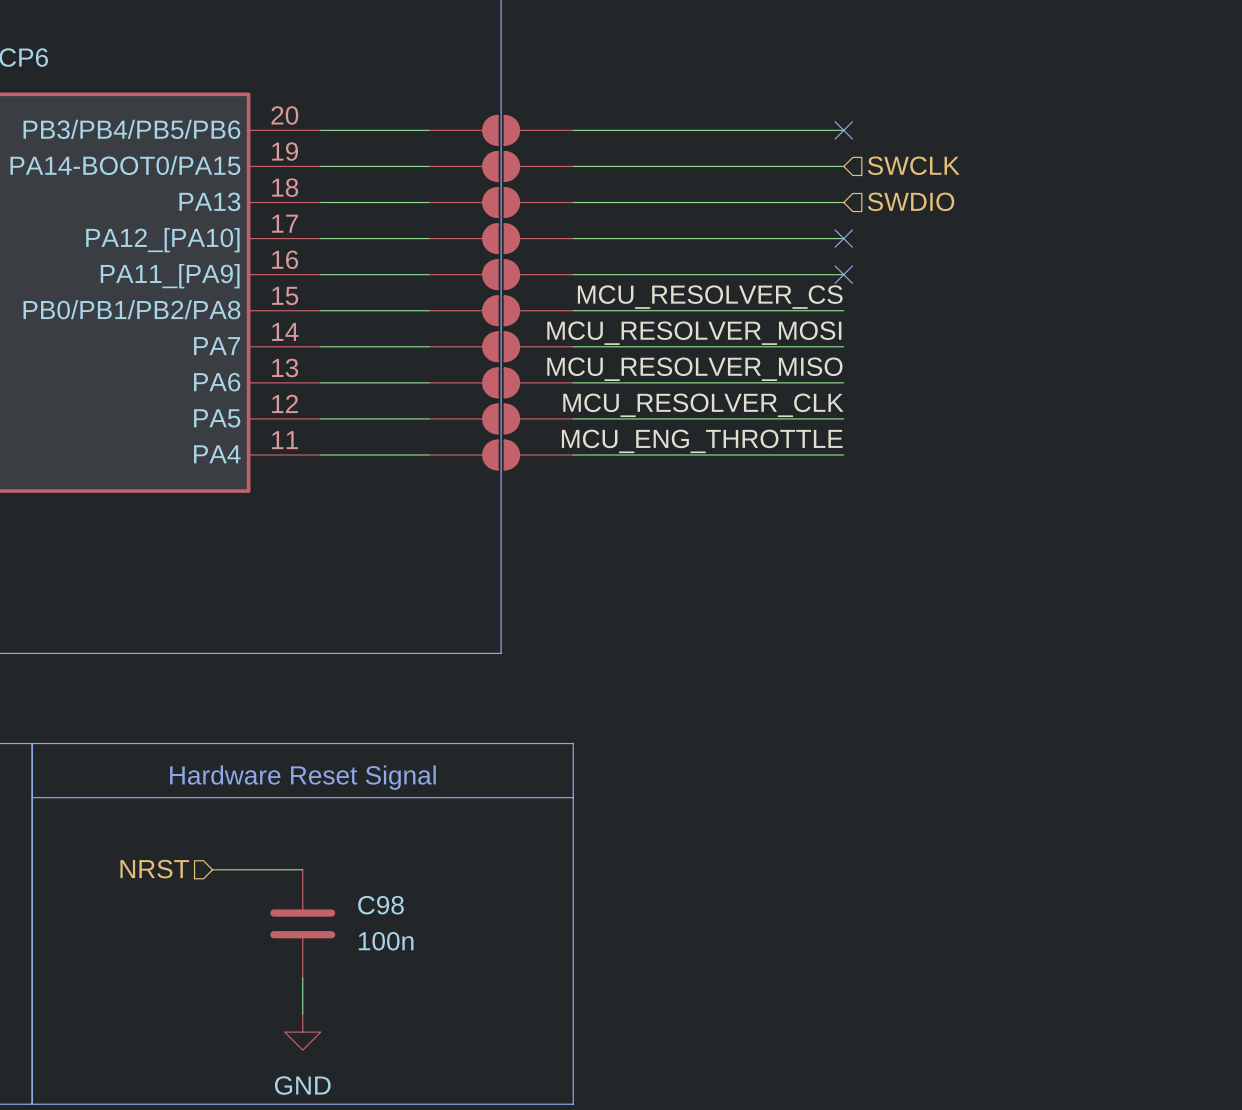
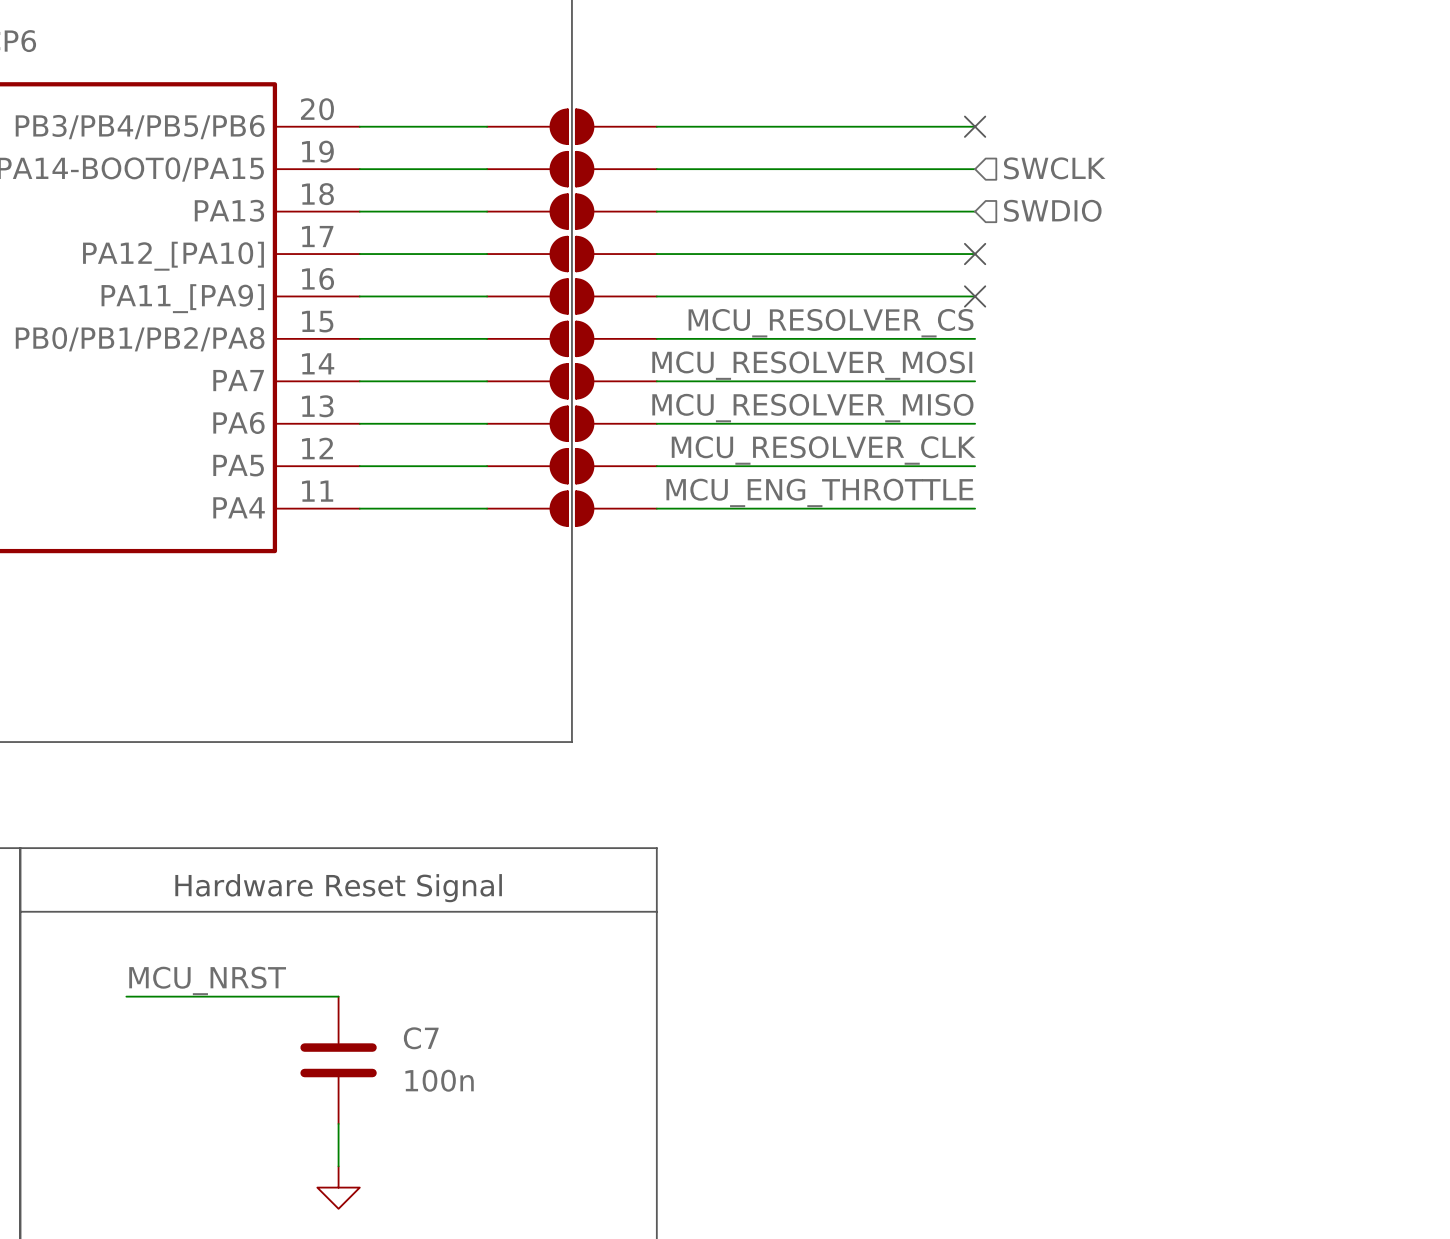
label: none -> MCU_NRST (207, 980)
wire: none -> (126, 996) (232, 996)
hierarchical label: NRST (154, 869) -> none
C98 name: C98 (380, 905) -> C7 (421, 1038)

